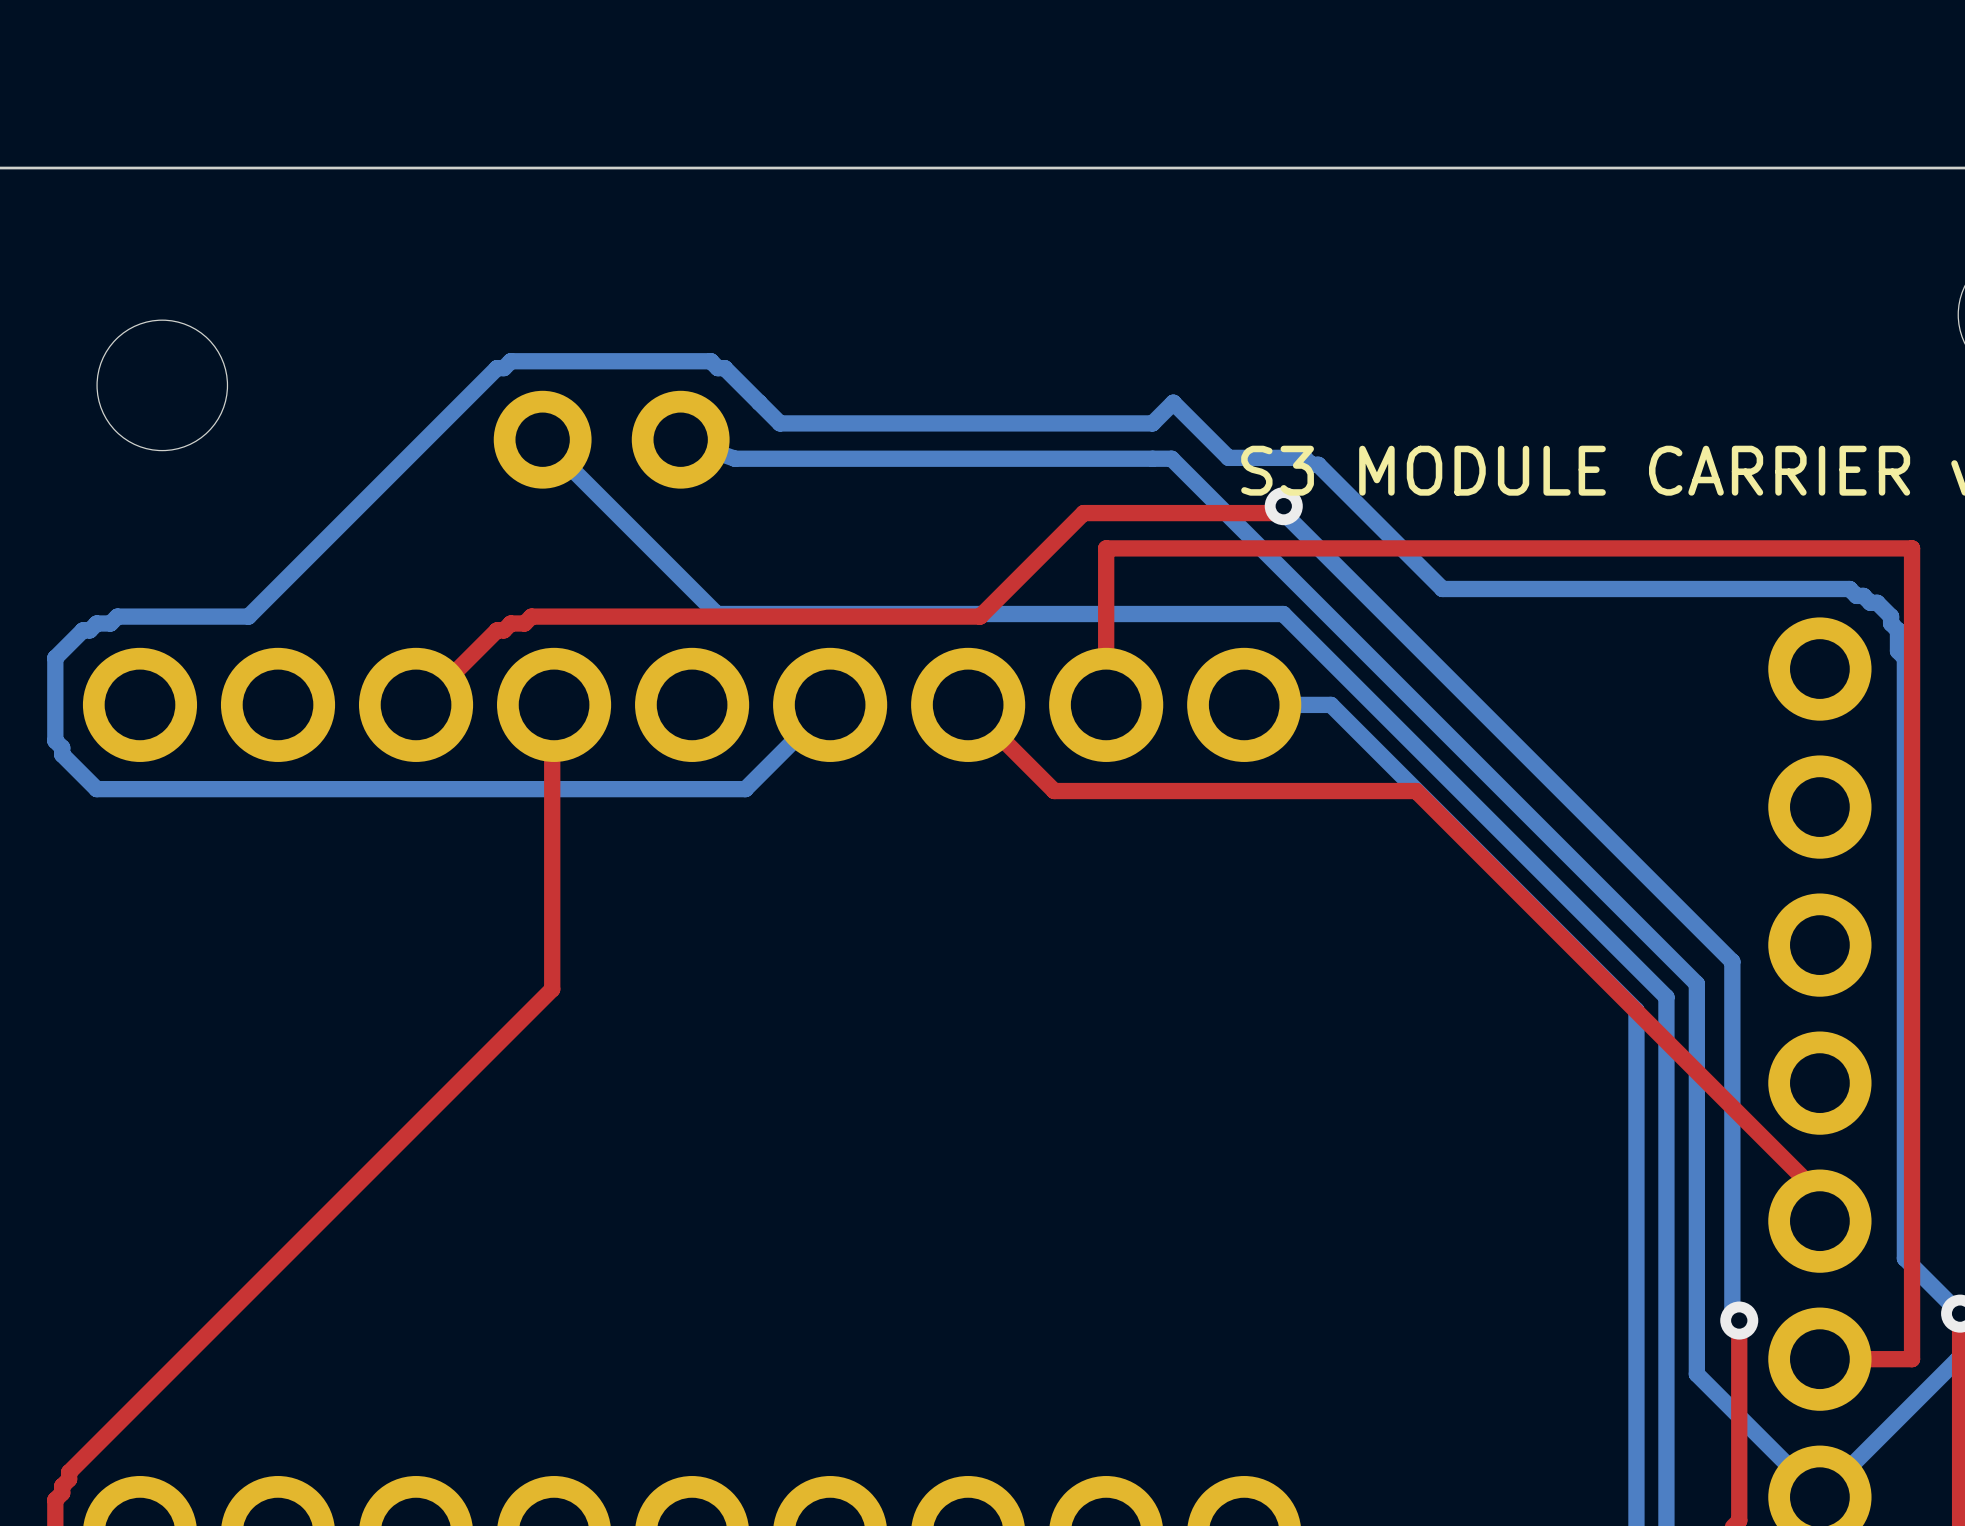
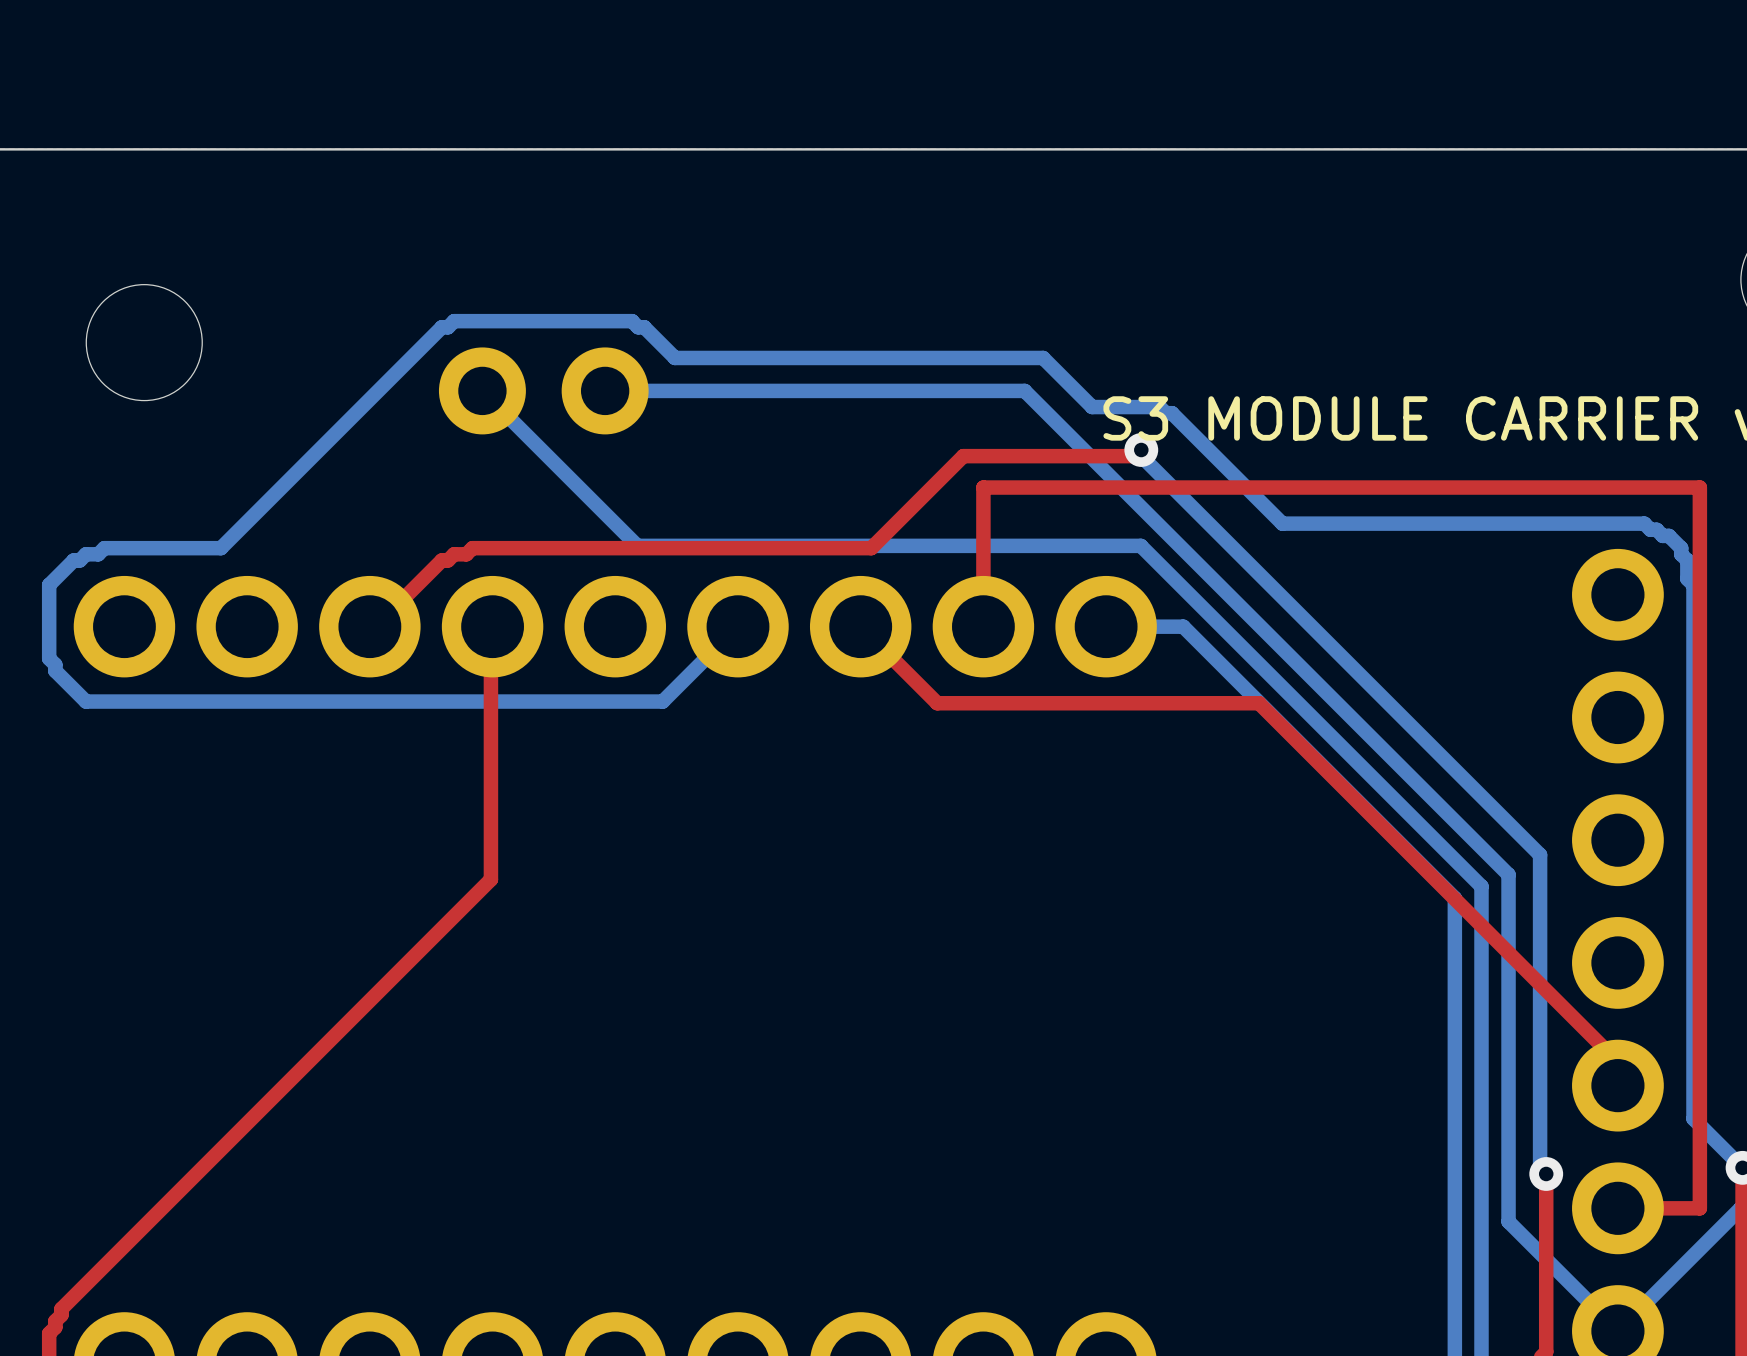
bottom track: (759, 402) (780, 423) (1152, 423) (1173, 402) -> (675, 357) (1043, 357)
bottom track: (680, 439) (735, 458) (1171, 458) -> (605, 390) (1024, 390) (1041, 407)

